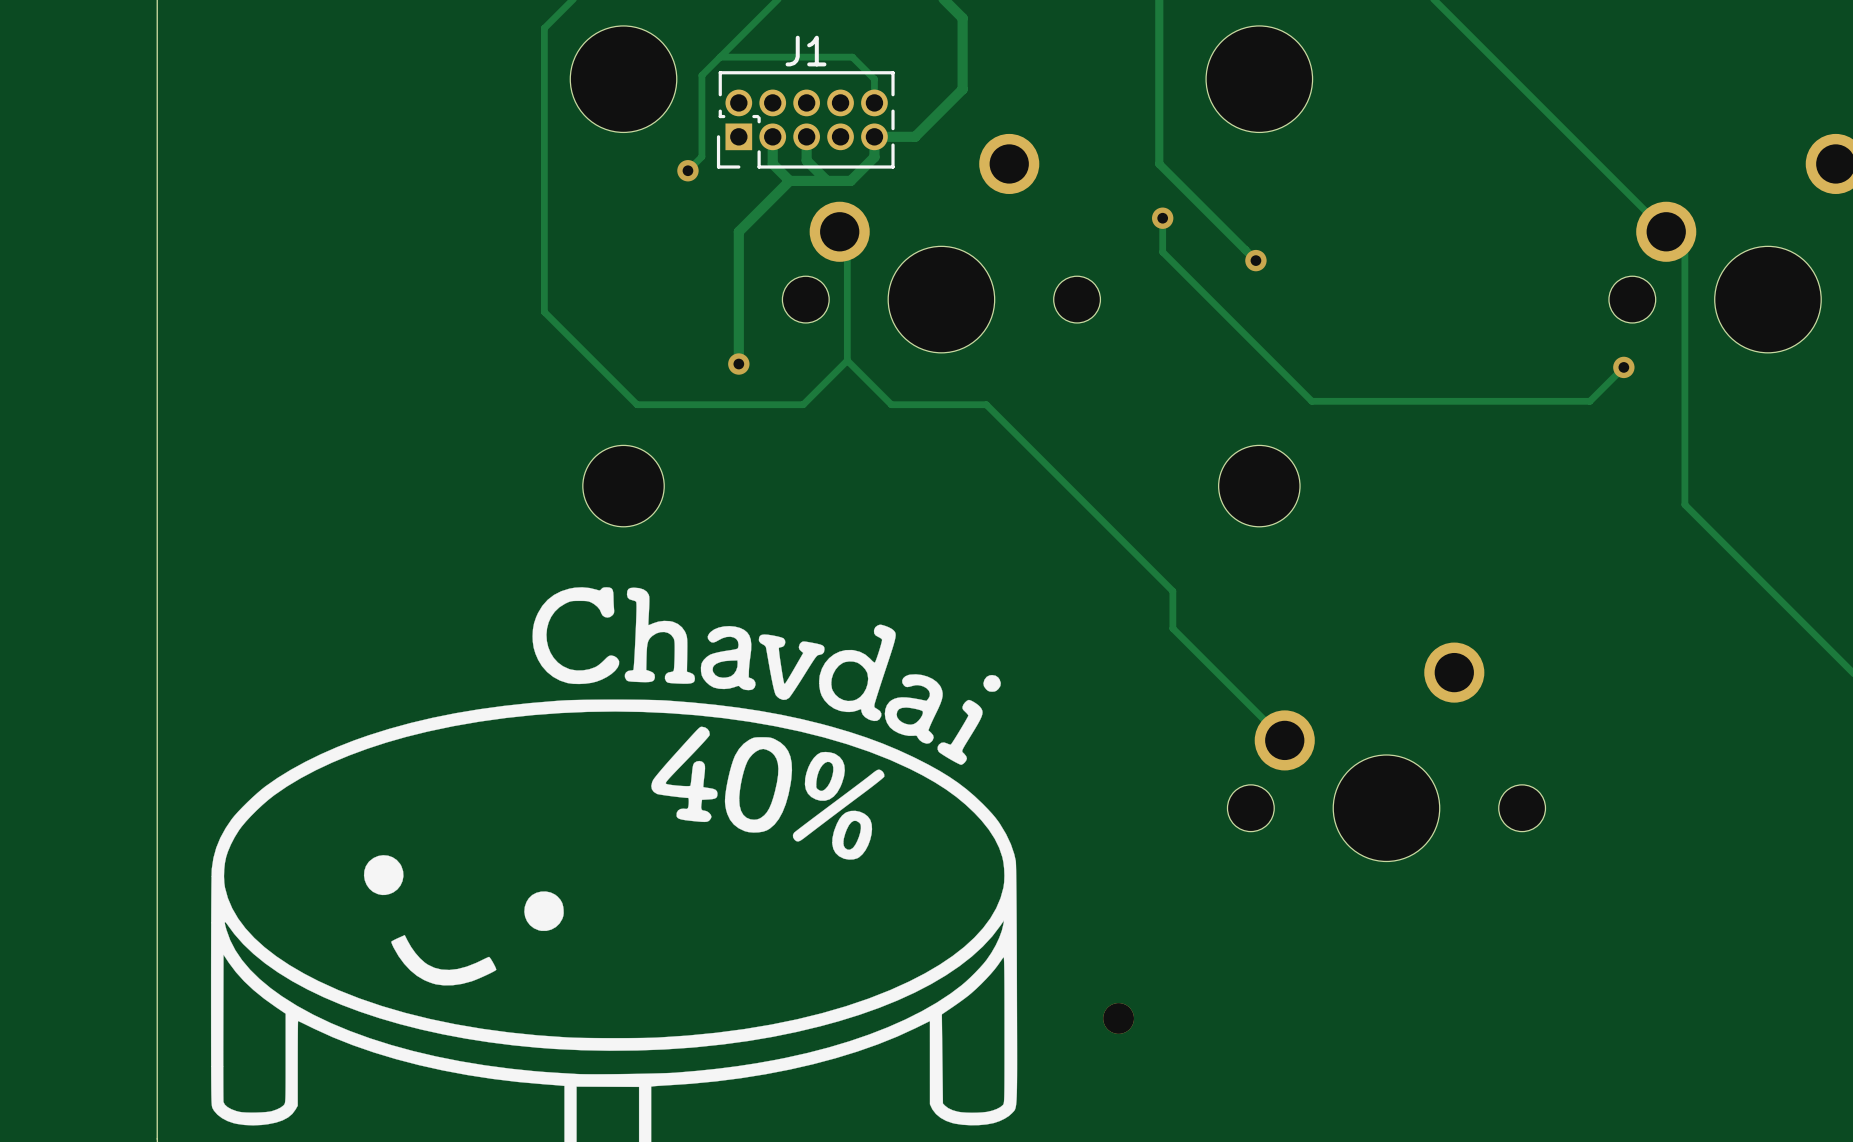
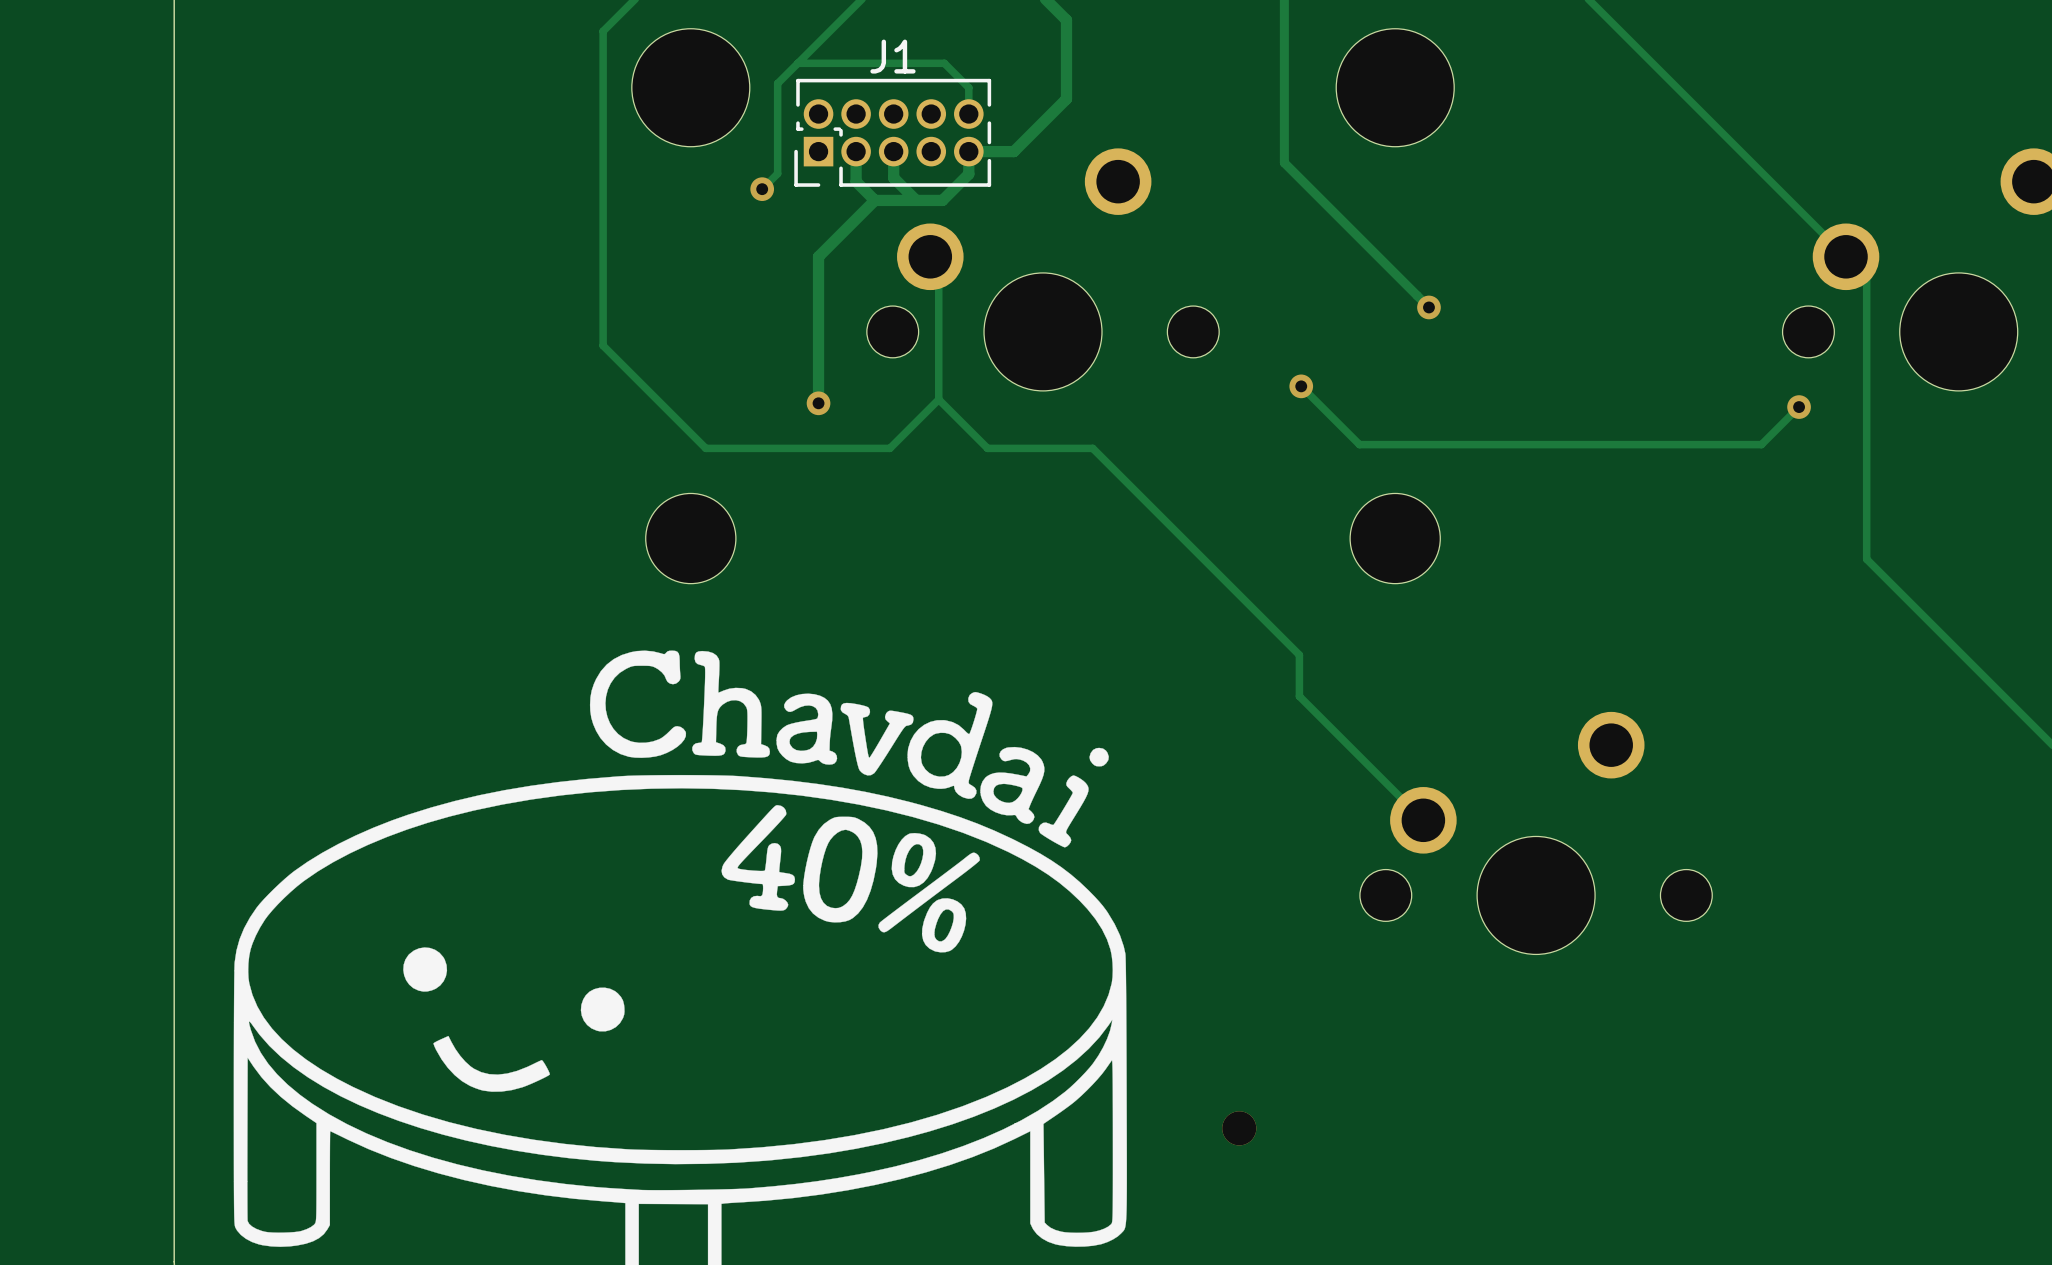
track: (1159, 147) (1159, 163) (1255, 260) -> (1284, 162) (1428, 307)
track: (1162, 218) (1162, 252) (1311, 401) -> (1301, 386) (1359, 444) (1453, 444)
via: (1162, 218) -> none
via position: (1255, 260) -> (1428, 307)
via: none -> (1301, 386)

